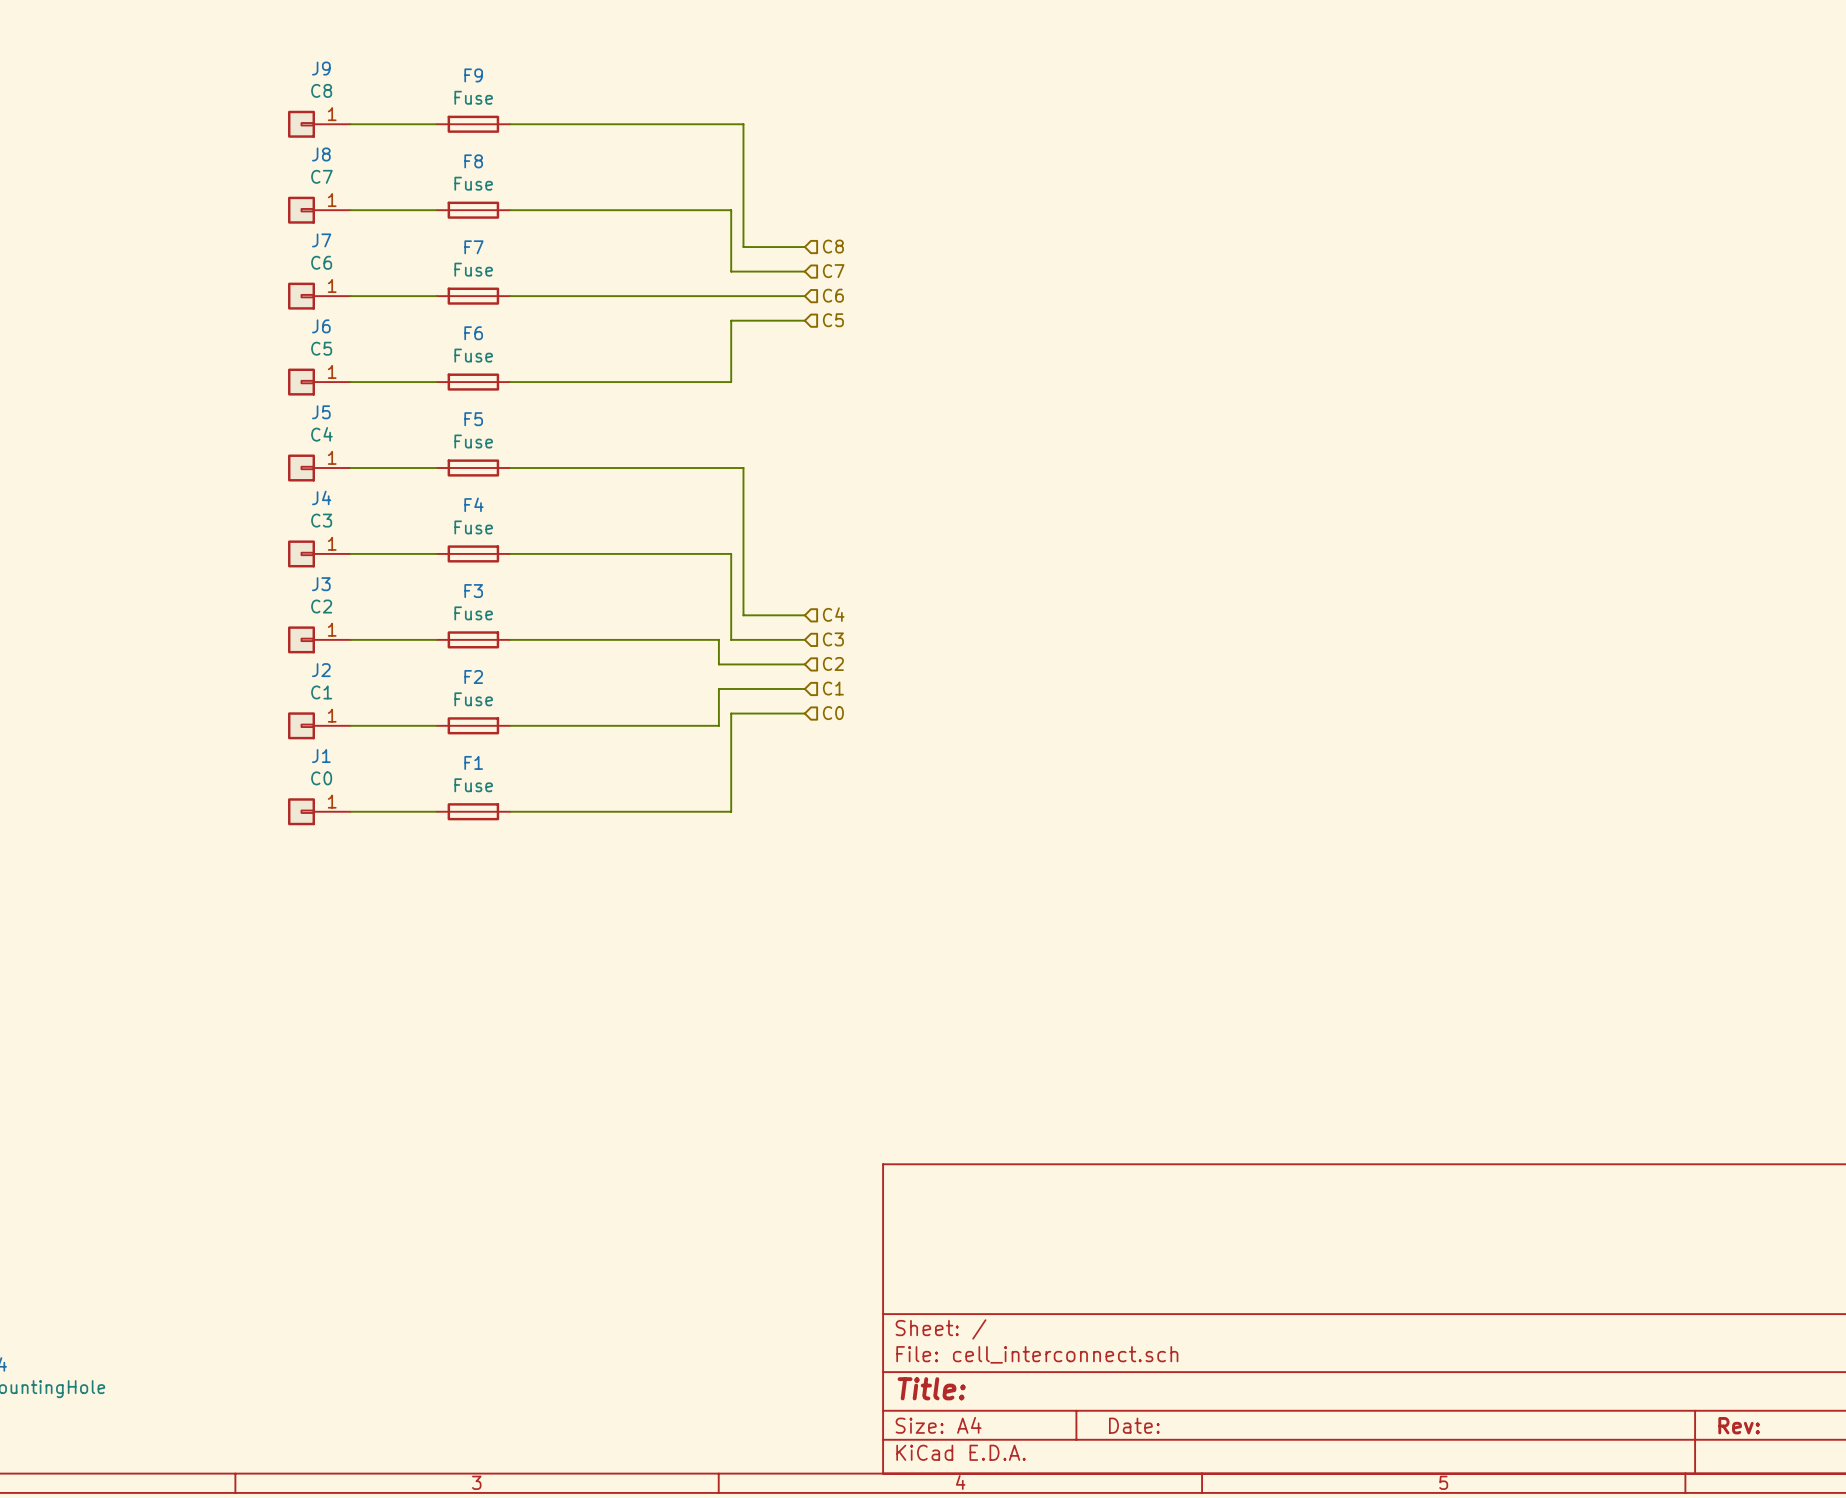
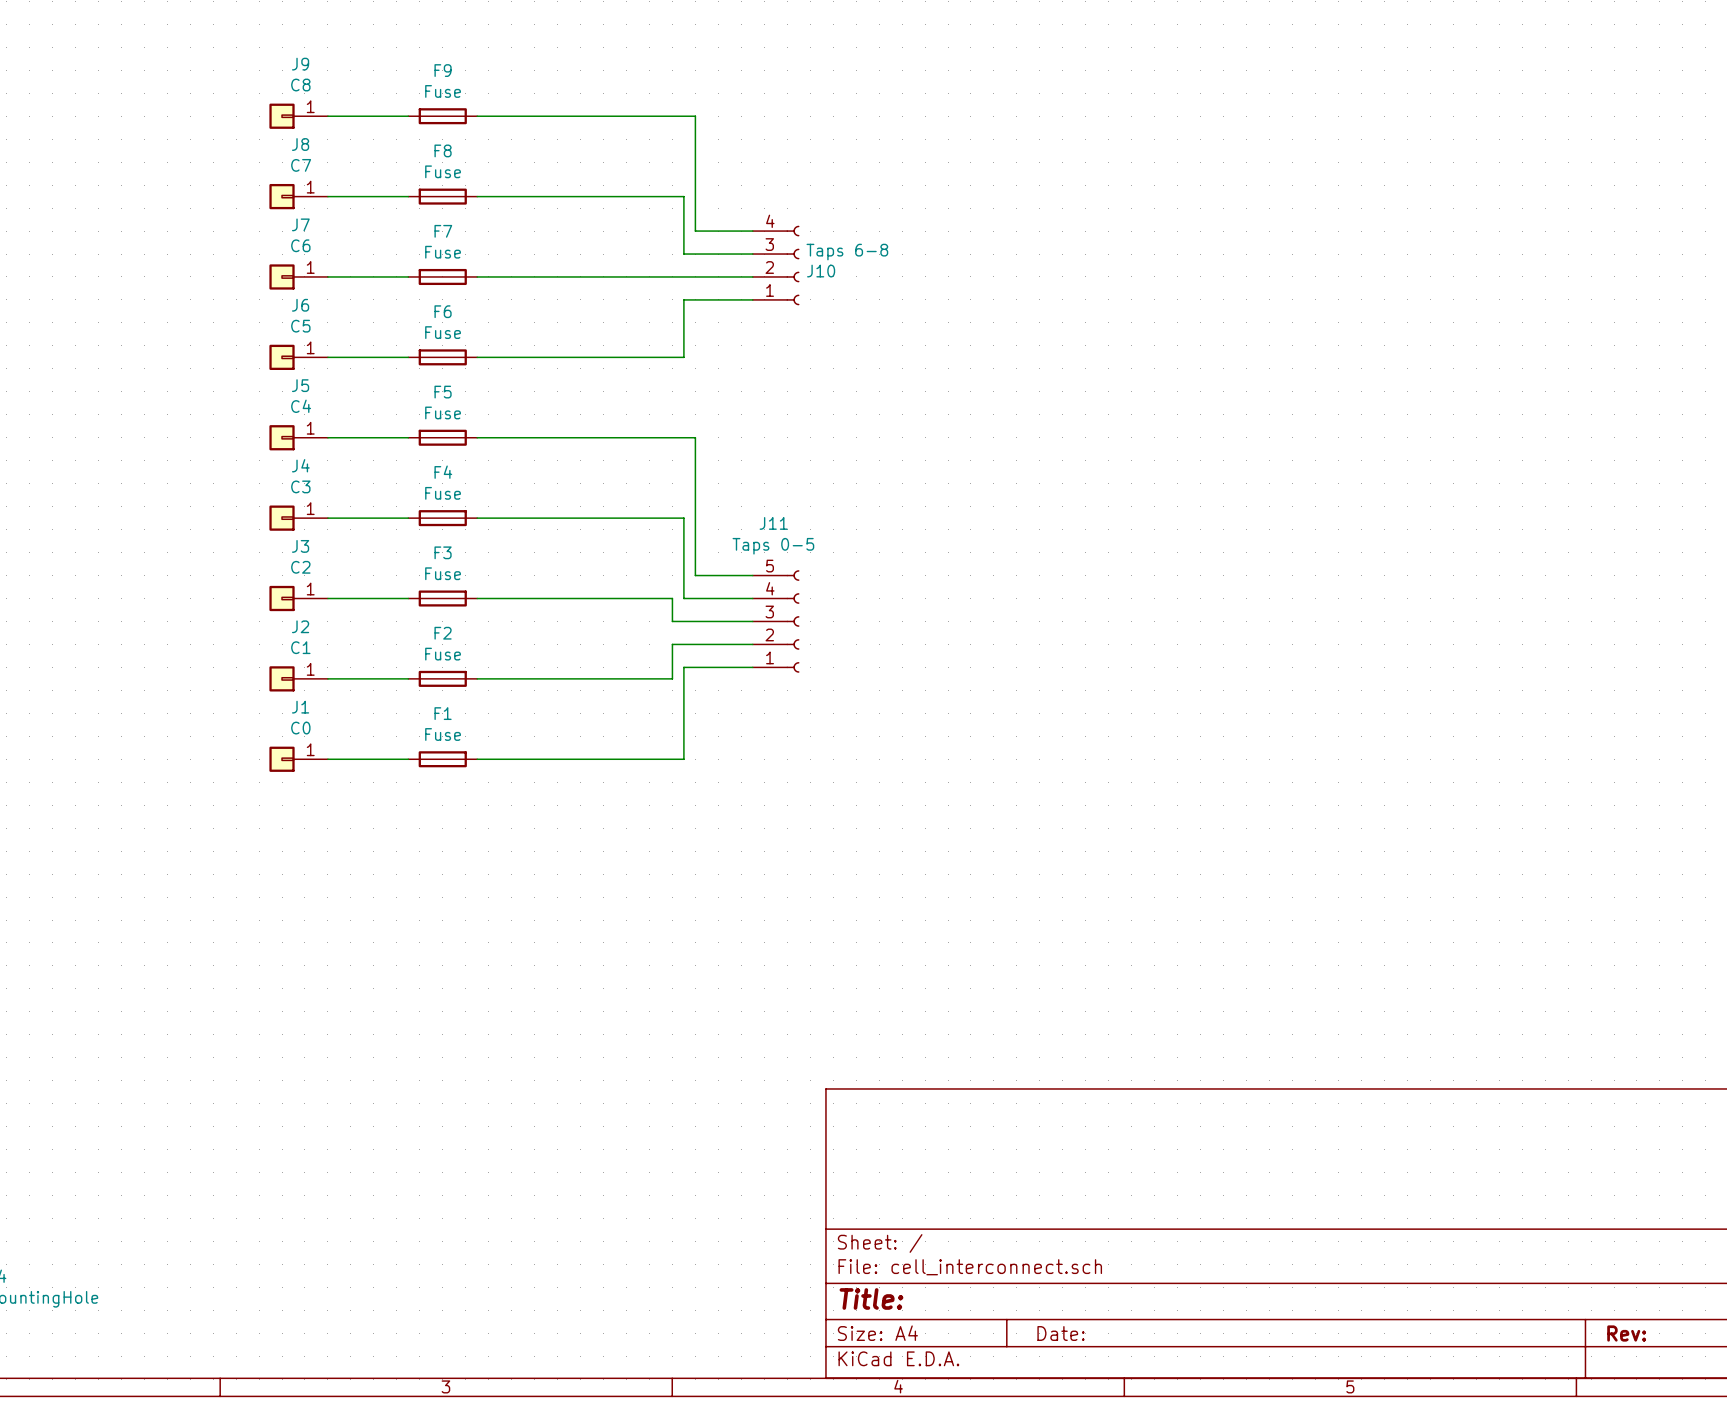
hierarchical label: C8 (833, 246) -> none
hierarchical label: C7 (833, 271) -> none
J10: none -> Taps 6-8 (776, 265)
hierarchical label: C6 (833, 295) -> none
hierarchical label: C5 (833, 320) -> none
hierarchical label: C4 (833, 614) -> none
hierarchical label: C3 (833, 639) -> none
hierarchical label: C2 (833, 663) -> none
J11: none -> Taps 0-5 (776, 621)
hierarchical label: C1 (833, 688) -> none
hierarchical label: C0 (833, 713) -> none

